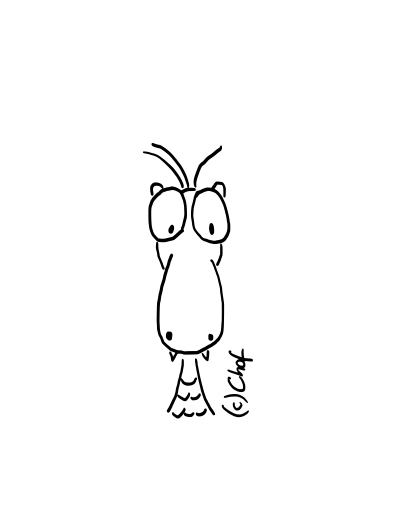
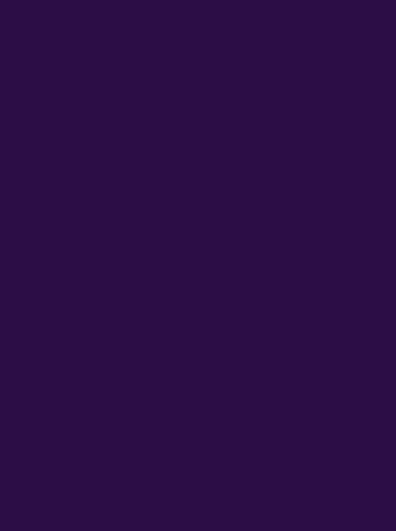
drawing: [142, 142, 253, 419] -> none

